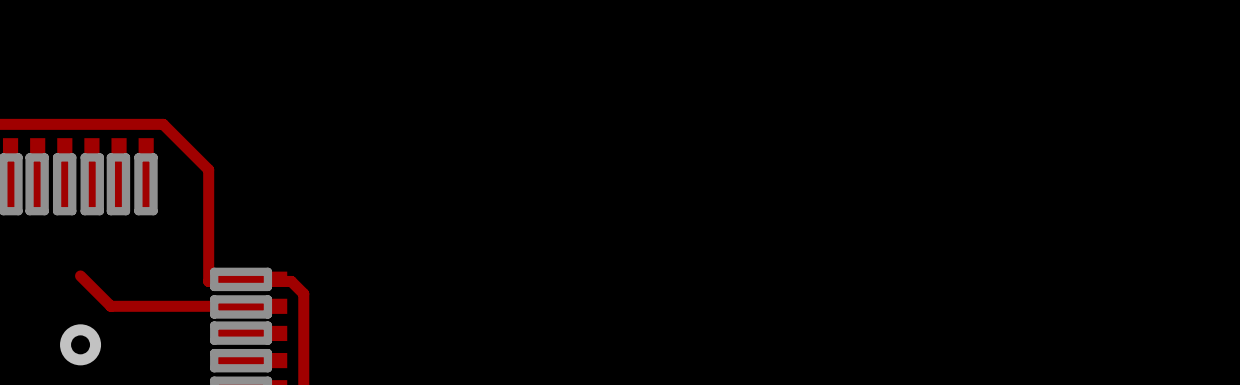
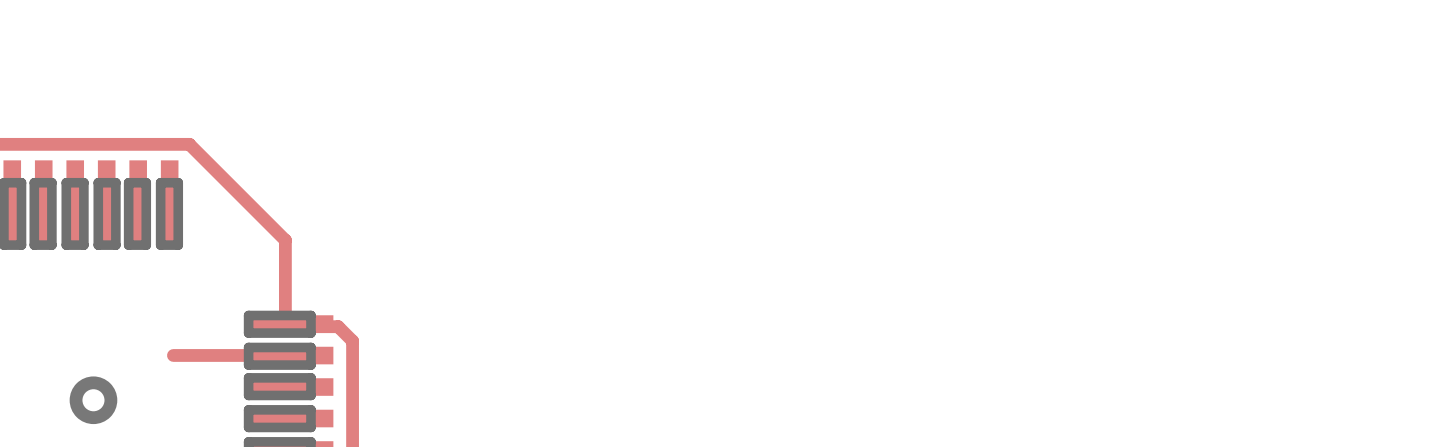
track: (208, 169) (208, 281) (250, 281) (250, 279) -> (242, 197) (285, 240) (285, 321) (290, 324)
track: (80, 275) (110, 306) (149, 306) -> none

